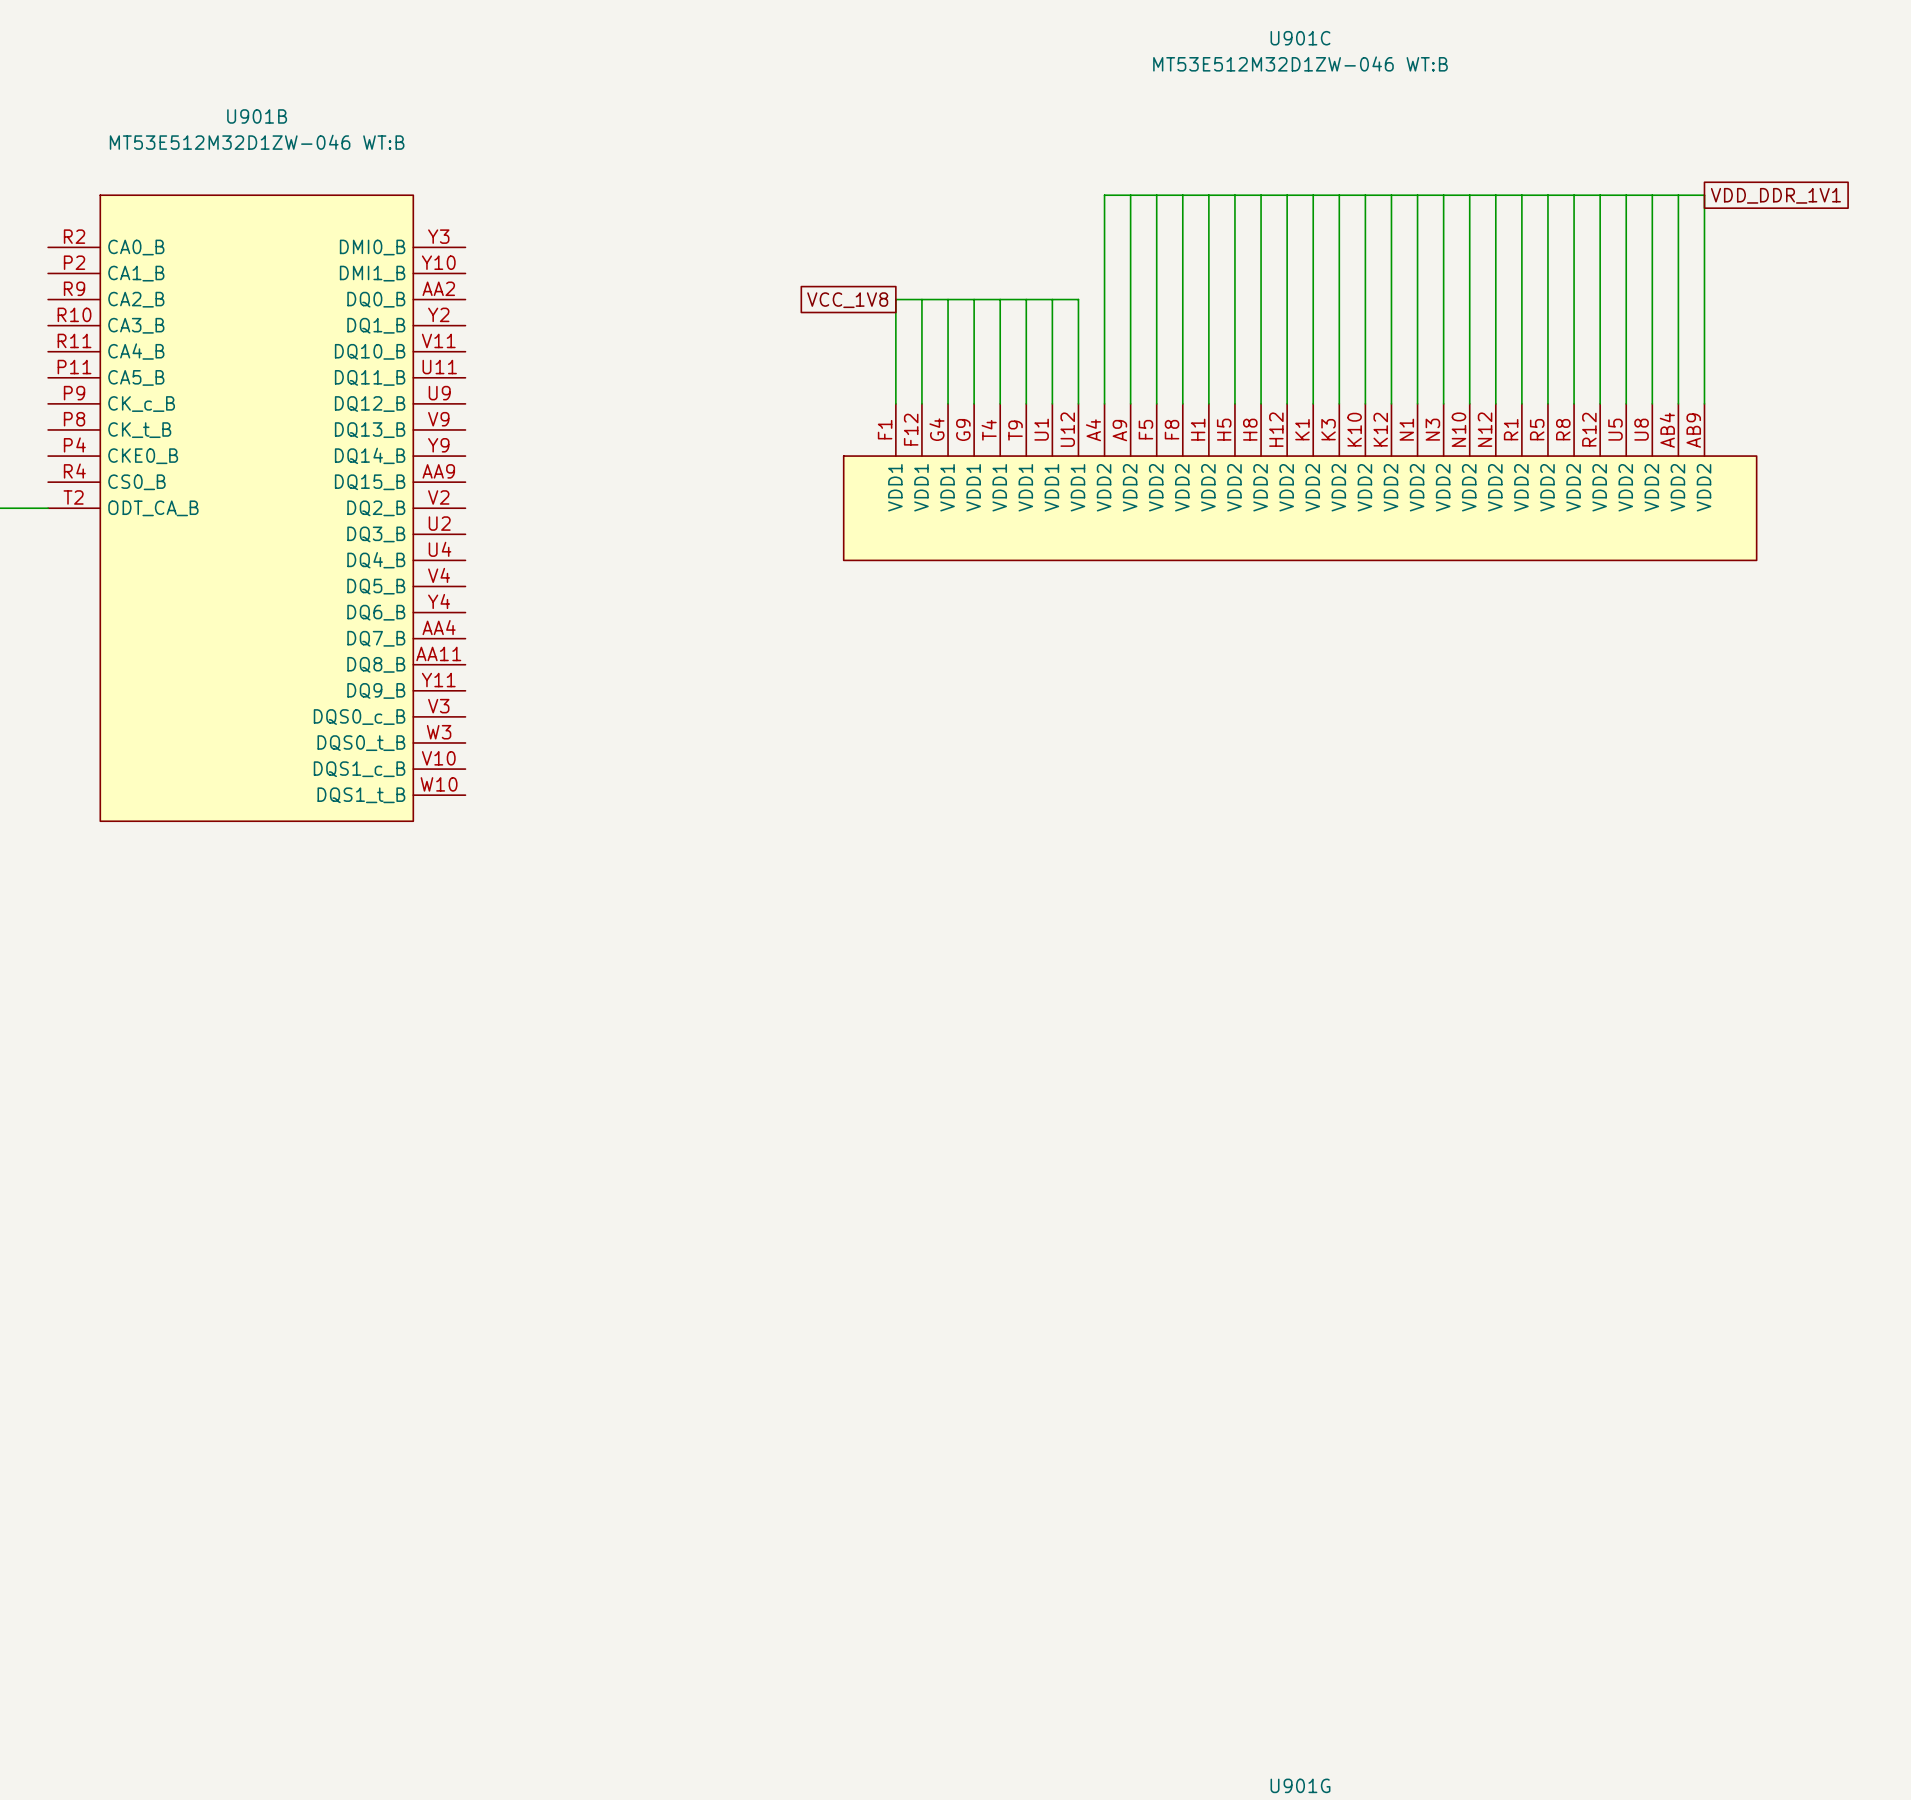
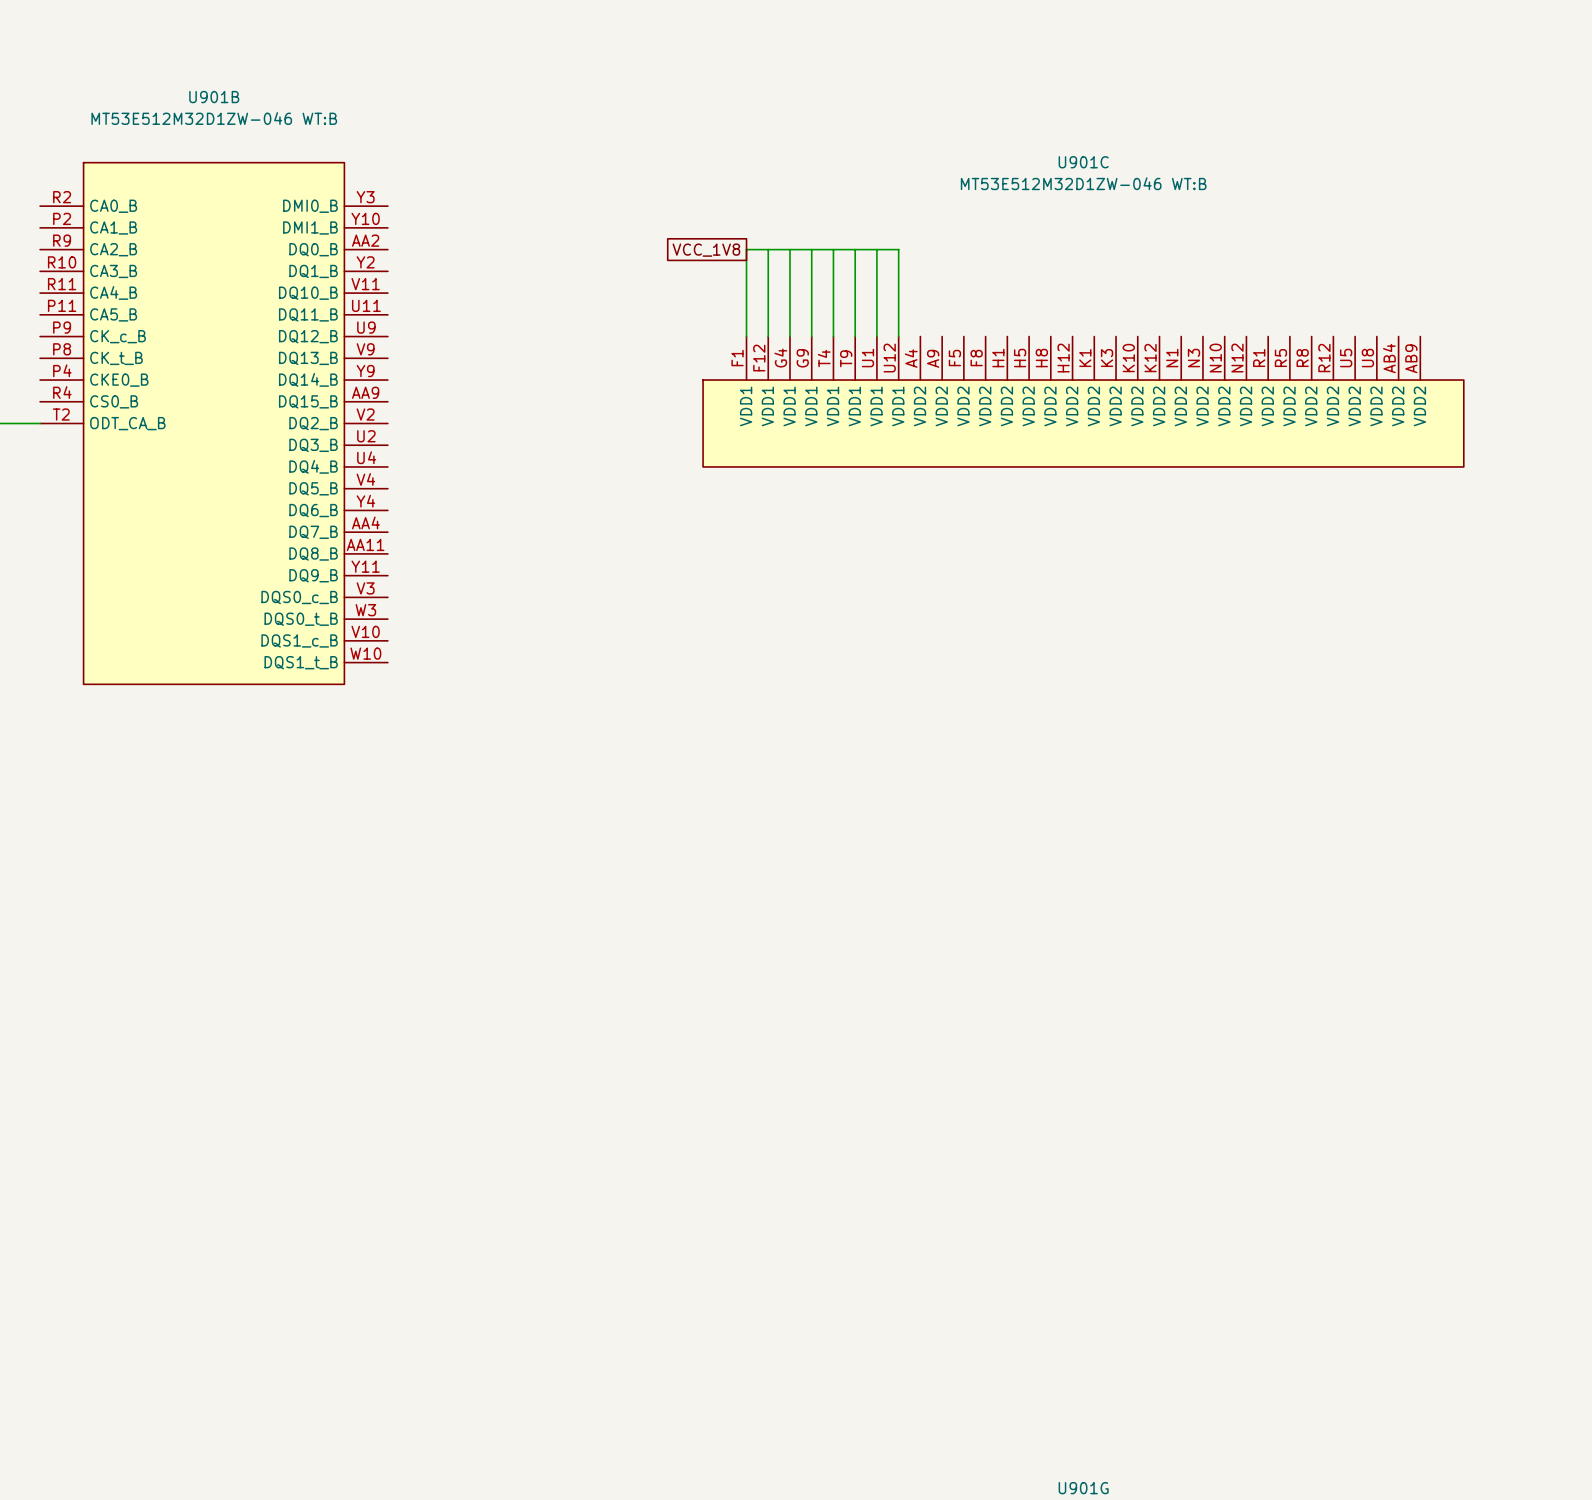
U901C name position: U901C (1300, 38) -> U901C (1083, 162)
U901C value position: MT53E512M32D1ZW-046 WT:B (1300, 63) -> MT53E512M32D1ZW-046 WT:B (1083, 183)
wire: (1130, 195) (1130, 403) -> none
wire: (1156, 195) (1156, 403) -> none
wire: (1182, 195) (1182, 403) -> none
wire: (1208, 195) (1208, 403) -> none
wire: (1234, 195) (1234, 403) -> none
wire: (1261, 195) (1261, 403) -> none
wire: (1287, 195) (1287, 403) -> none
wire: (1313, 195) (1313, 403) -> none
wire: (1339, 195) (1339, 403) -> none
wire: (1365, 195) (1365, 403) -> none
wire: (1391, 195) (1391, 403) -> none
wire: (1417, 195) (1417, 403) -> none
wire: (1443, 195) (1443, 403) -> none
wire: (1469, 195) (1469, 403) -> none
wire: (1495, 195) (1495, 403) -> none
wire: (1521, 195) (1521, 403) -> none
wire: (1547, 195) (1547, 403) -> none
wire: (1574, 195) (1574, 403) -> none
wire: (1600, 195) (1600, 403) -> none
wire: (1626, 195) (1626, 403) -> none
wire: (1652, 195) (1652, 403) -> none
wire: (1678, 195) (1678, 403) -> none
global label: VDD_DDR_1V1 (1775, 195) -> none
wire: (1104, 403) (1104, 195) (1704, 195) (1704, 403) -> none

